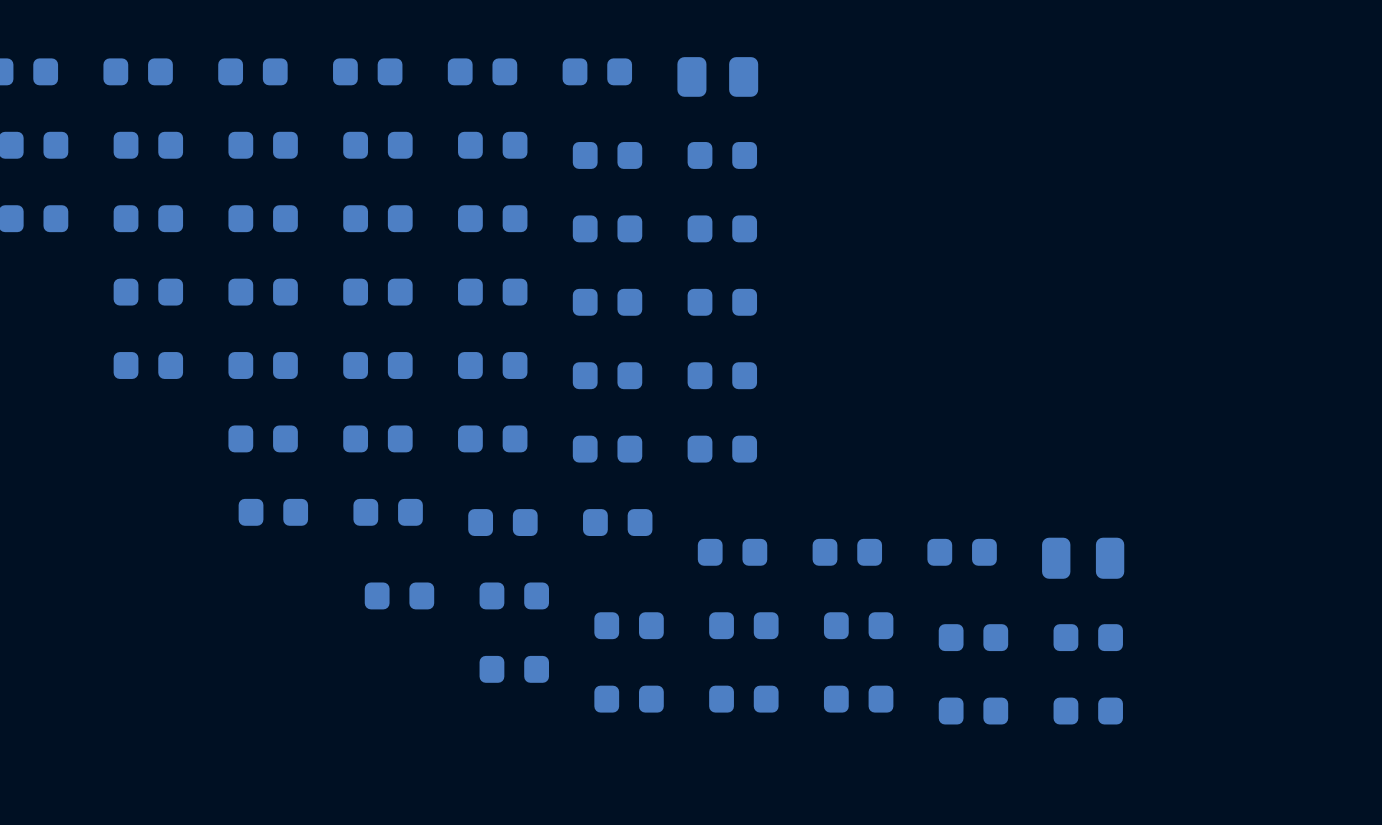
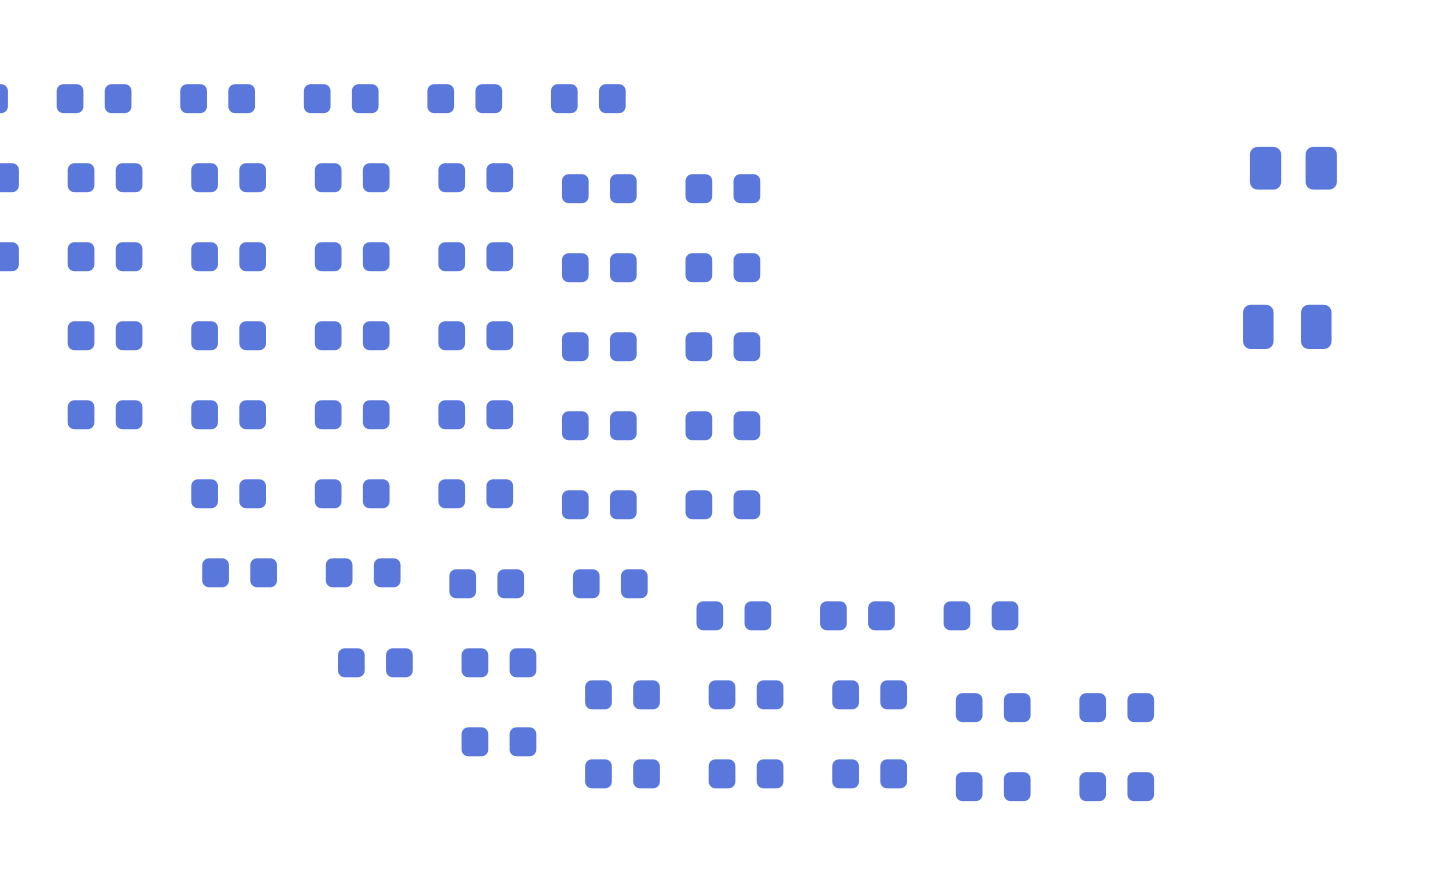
part position: (717, 76) -> (1293, 168)
part position: (1083, 558) -> (1287, 326)

